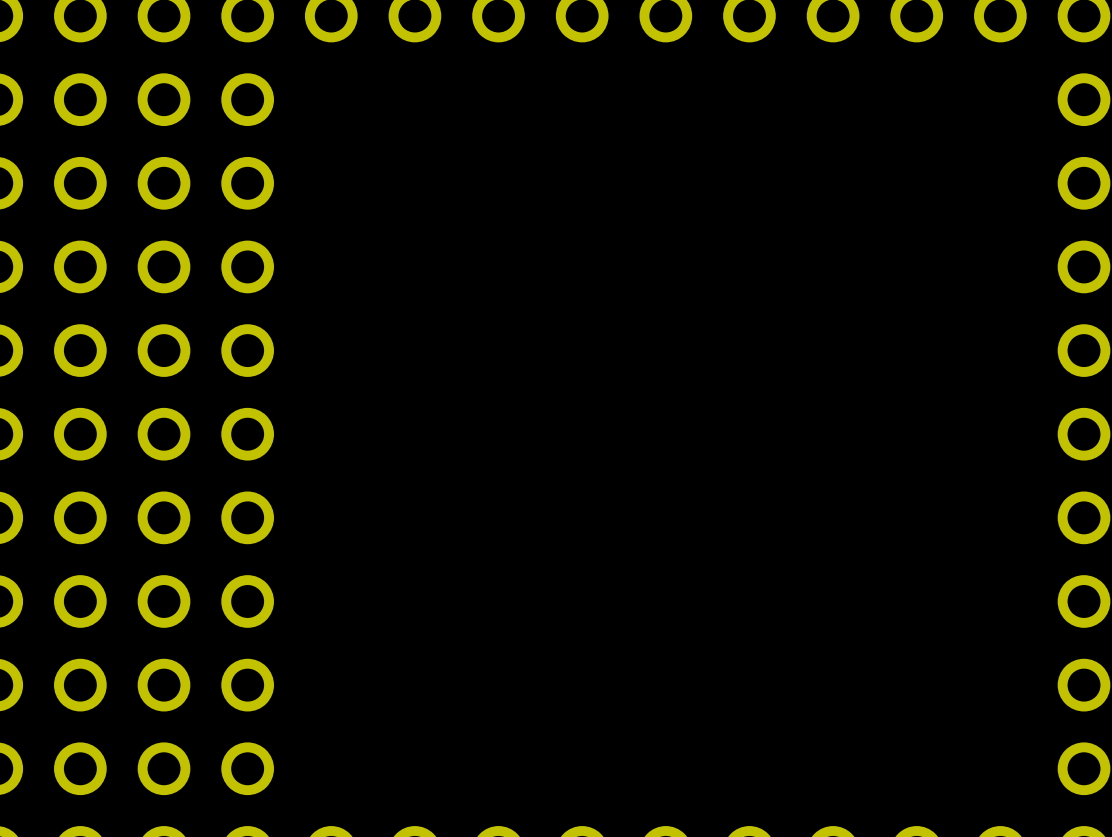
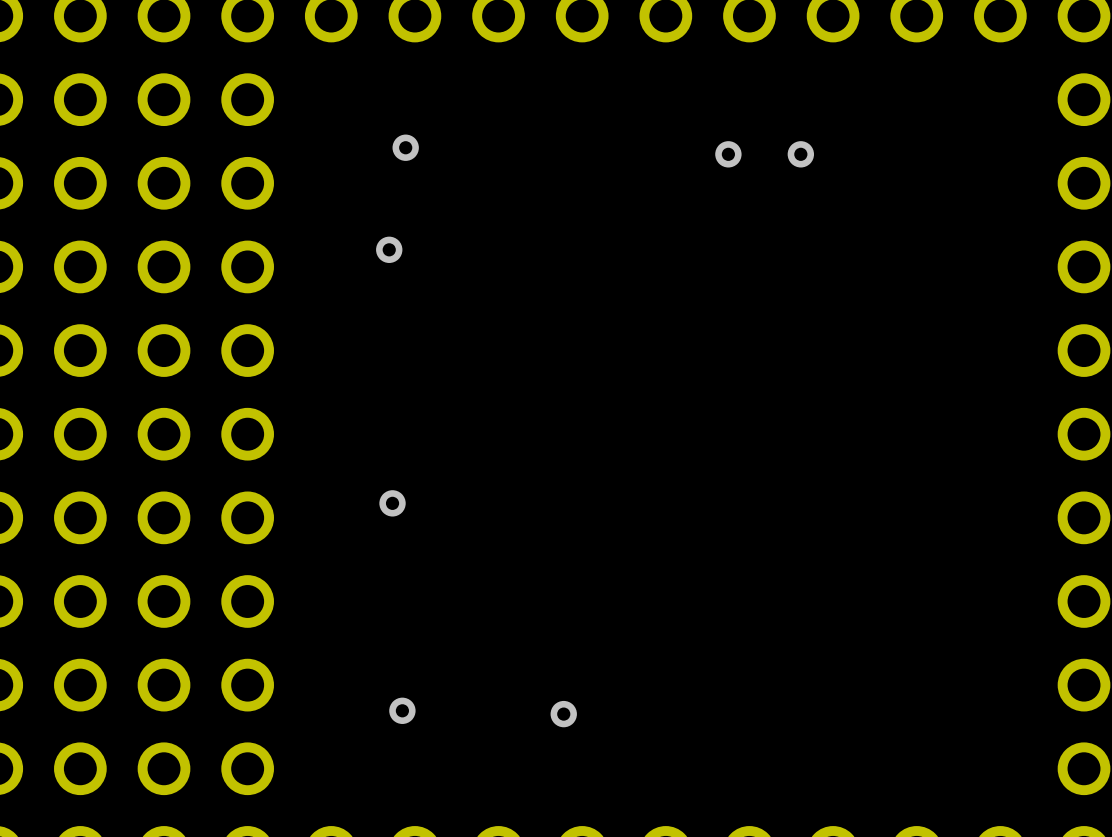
via: none -> (405, 147)
via: none -> (728, 154)
via: none -> (800, 154)
via: none -> (389, 249)
via: none -> (392, 503)
via: none -> (402, 710)
via: none -> (563, 714)

